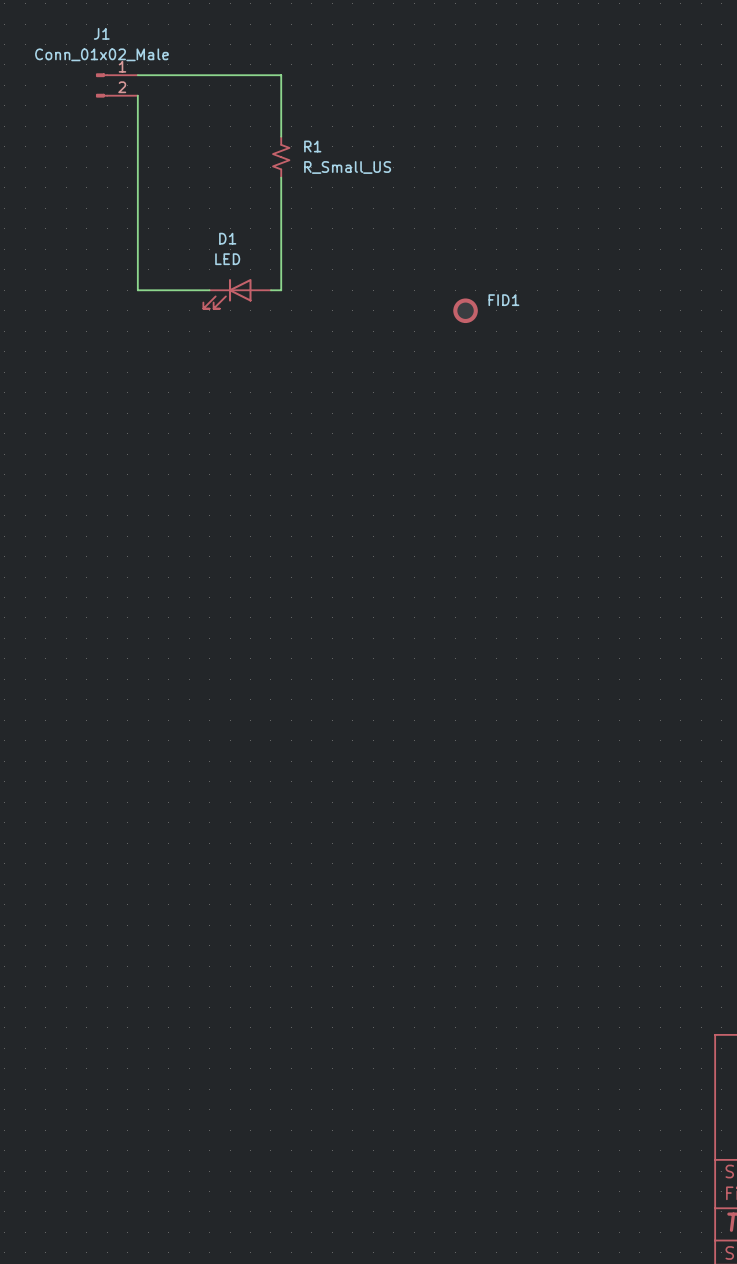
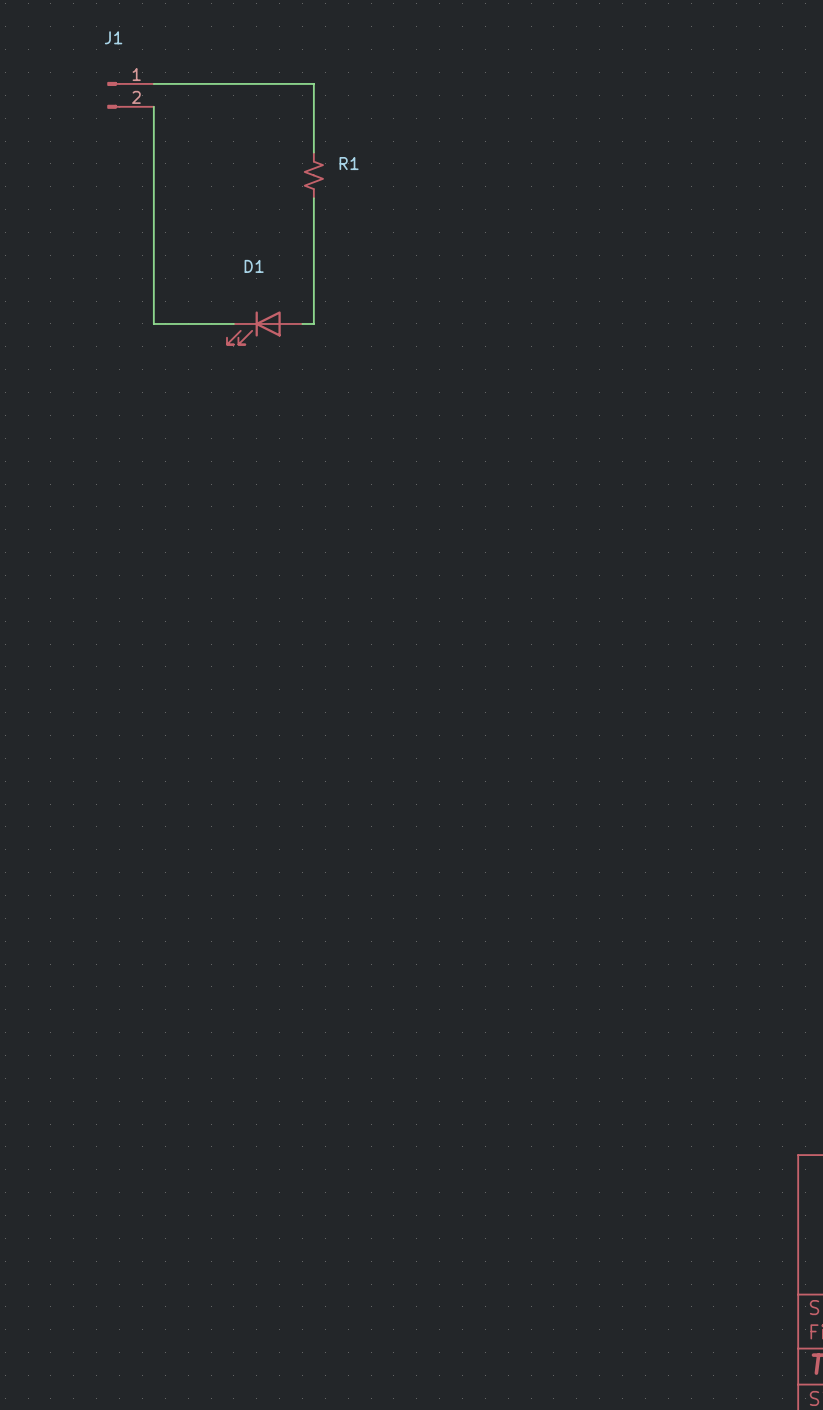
J1 value: Conn_01x02_Male (101, 54) -> none
R1 value: R_Small_US (347, 167) -> none
D1 value: LED (227, 259) -> none
FID1: (465, 310) -> none

